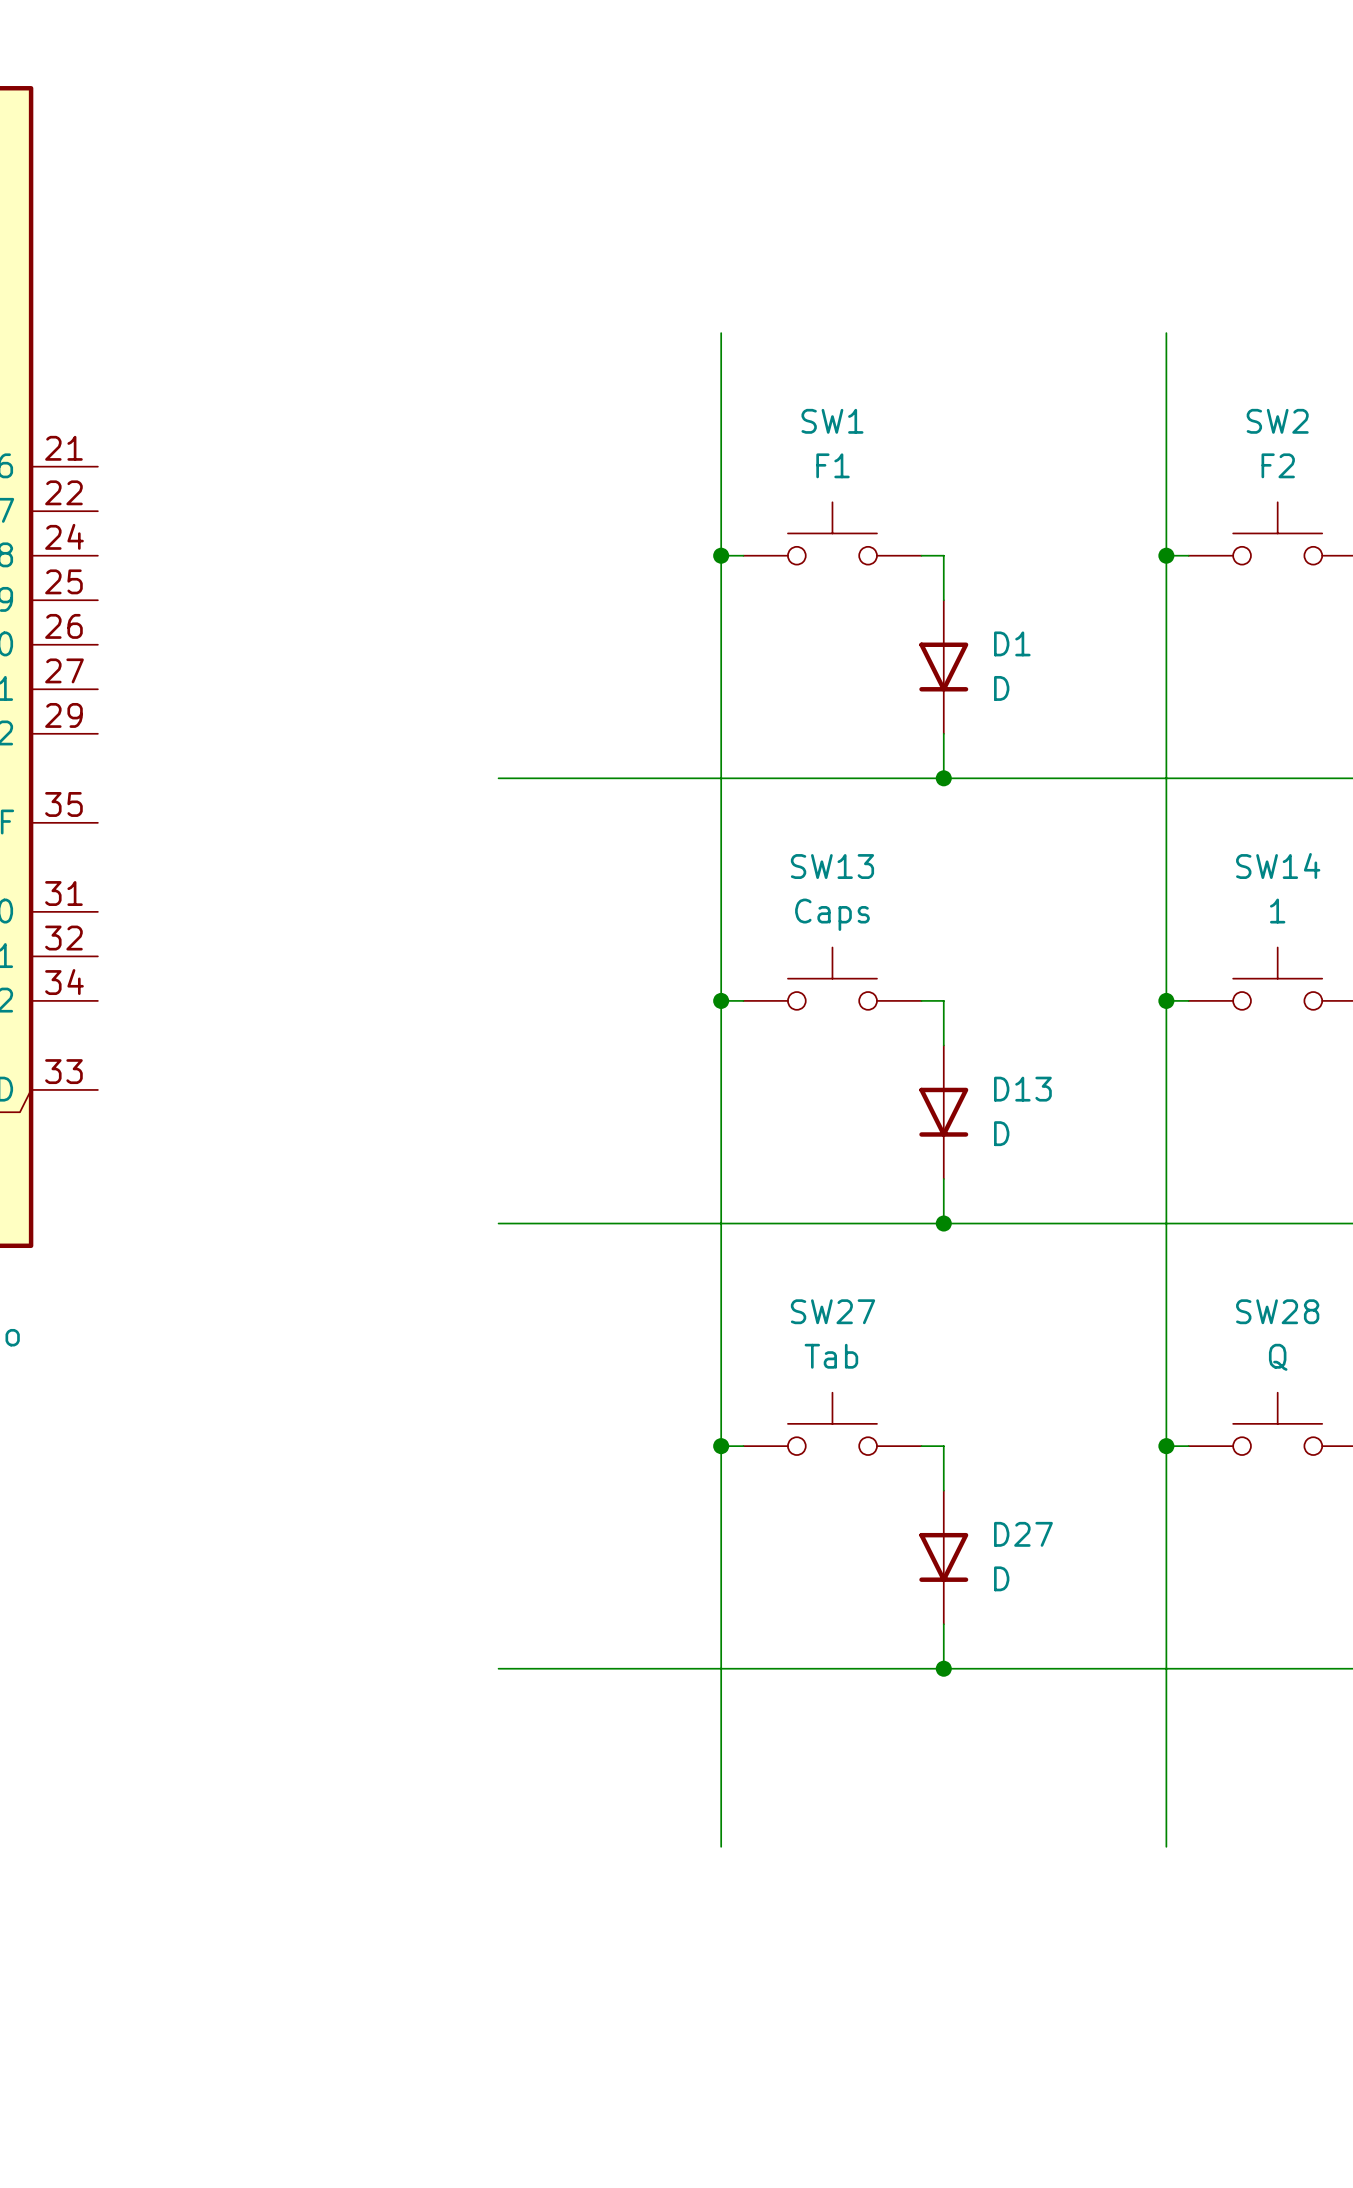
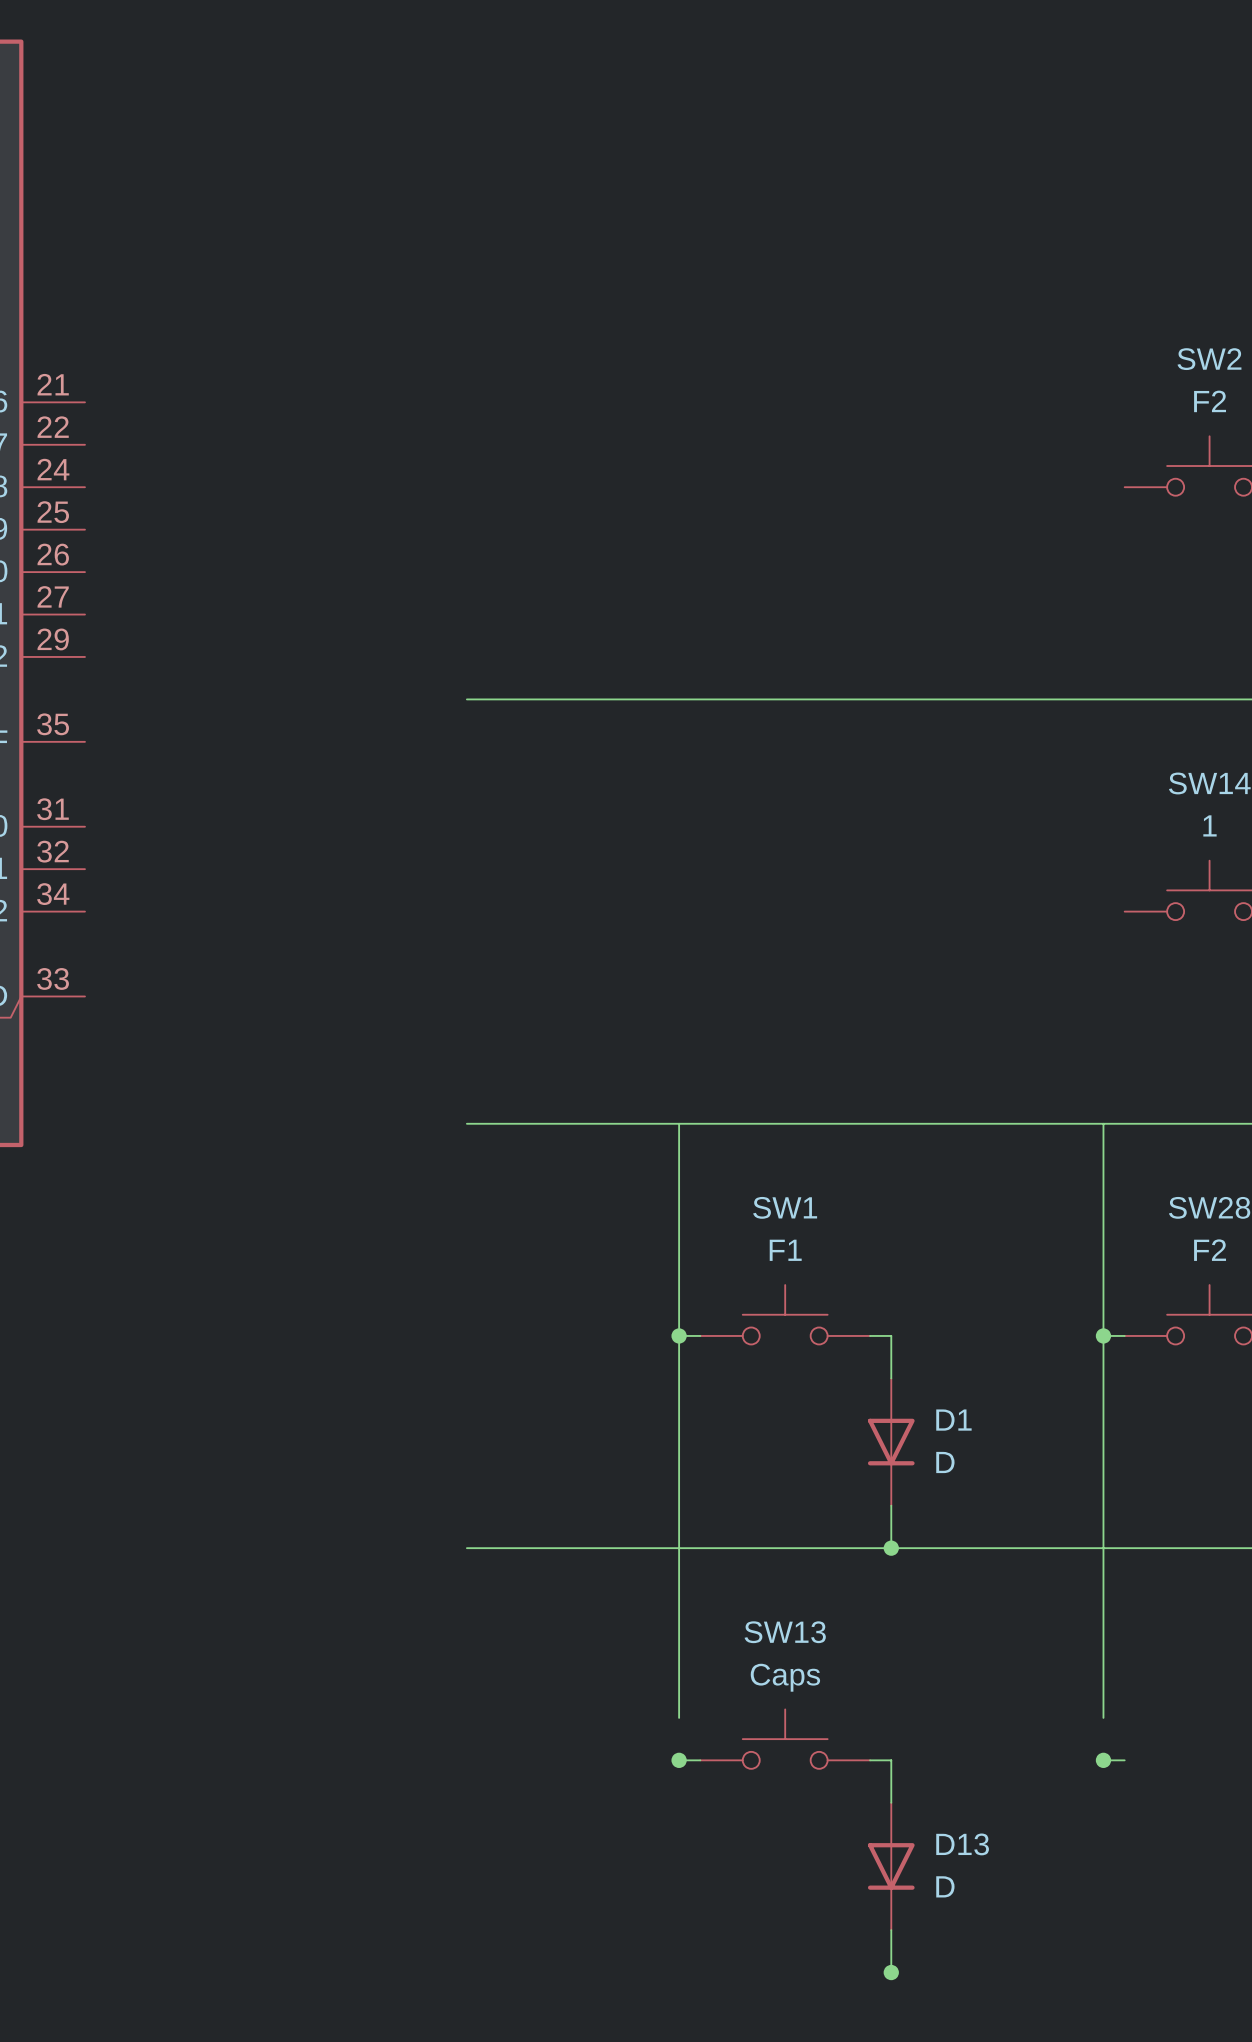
wire: (721, 333) (721, 1223) -> none
wire: (1166, 333) (1166, 1223) -> none
SW1: F1 (832, 533) -> none
wire: (721, 555) (743, 555) -> none
junction: (721, 555) -> none
wire: (921, 555) (943, 555) (943, 600) -> none
wire: (1166, 555) (1188, 555) -> none
junction: (1166, 555) -> none
D1: D (943, 667) -> none
wire: (943, 733) (943, 778) -> none
junction: (943, 778) -> none
SW13 position: (832, 978) -> (785, 1739)
wire: (721, 1000) (743, 1000) -> none
junction: (721, 1000) -> none
wire: (921, 1000) (943, 1000) (943, 1045) -> none
wire: (1166, 1000) (1188, 1000) -> none
junction: (1166, 1000) -> none
D13 position: (943, 1112) -> (891, 1866)
wire: (943, 1179) (943, 1223) -> none
junction: (943, 1223) -> none
SW27 name: SW27 (833, 1311) -> SW1 (785, 1207)
SW27 value: Tab (831, 1356) -> F1 (785, 1250)
SW28 value: Q (1278, 1357) -> F2 (1210, 1250)
D27 name: D27 (1023, 1534) -> D1 (953, 1420)
wire: none -> (679, 1760) (700, 1760)
junction: none -> (679, 1760)
wire: none -> (870, 1760) (891, 1760) (891, 1802)
wire: none -> (1103, 1760) (1124, 1760)
junction: none -> (1103, 1760)
wire: none -> (891, 1930) (891, 1972)
junction: none -> (891, 1972)

